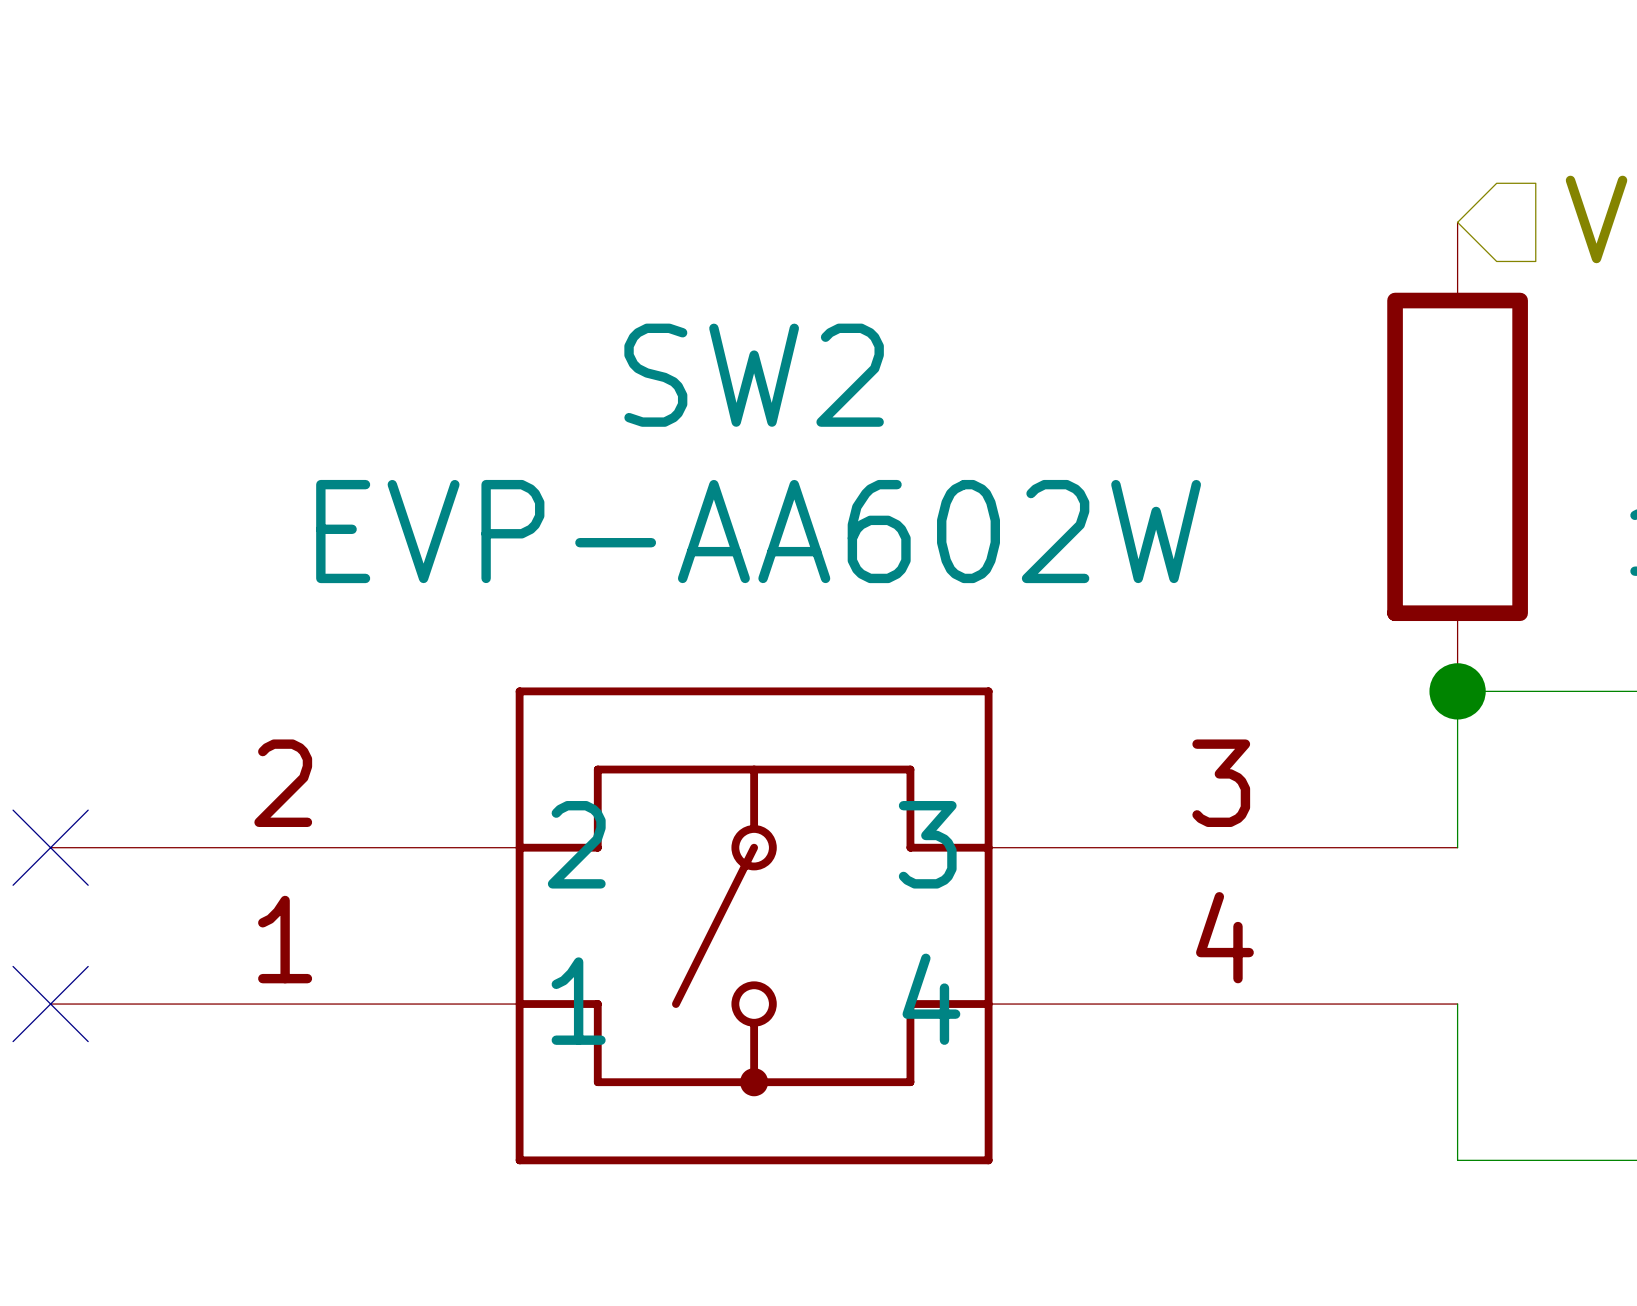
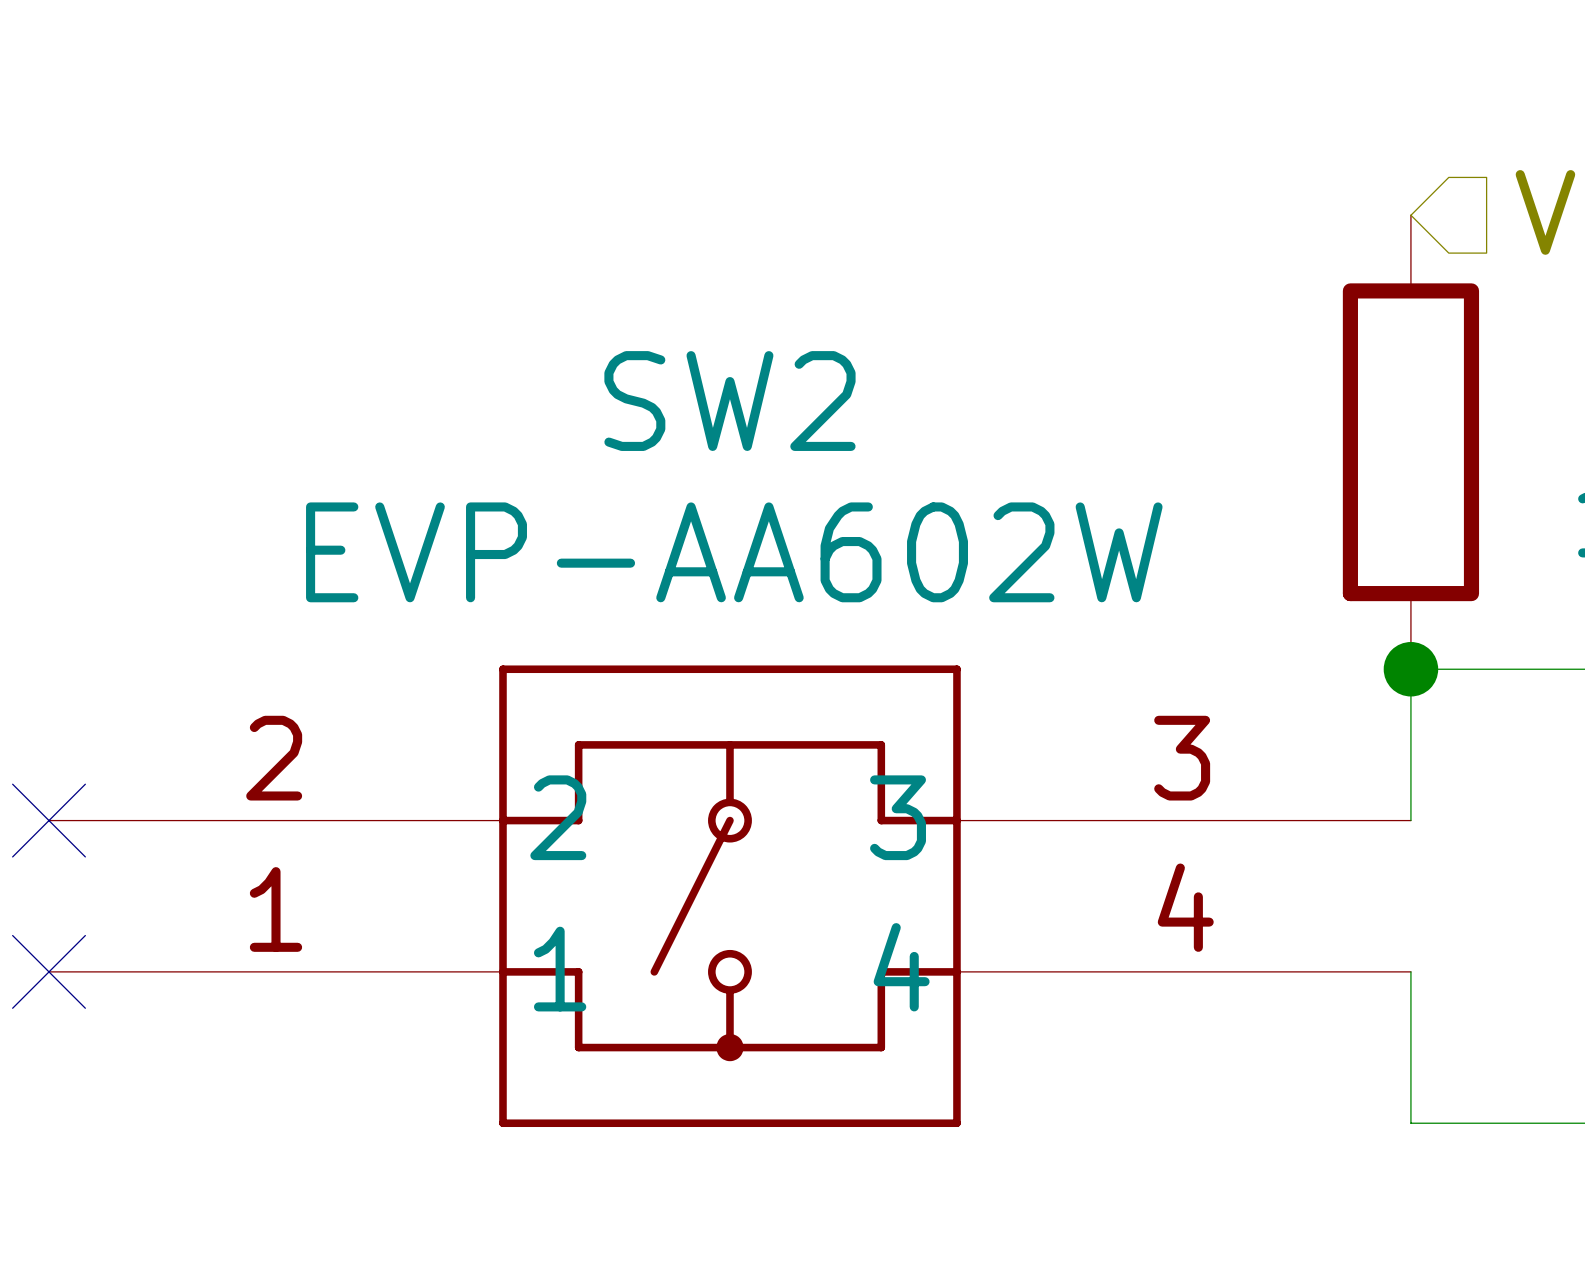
SW2 name position: SW2 (754, 375) -> SW2 (729, 401)
SW2 value position: EVP-AA602W (758, 531) -> EVP-AA602W (734, 552)

